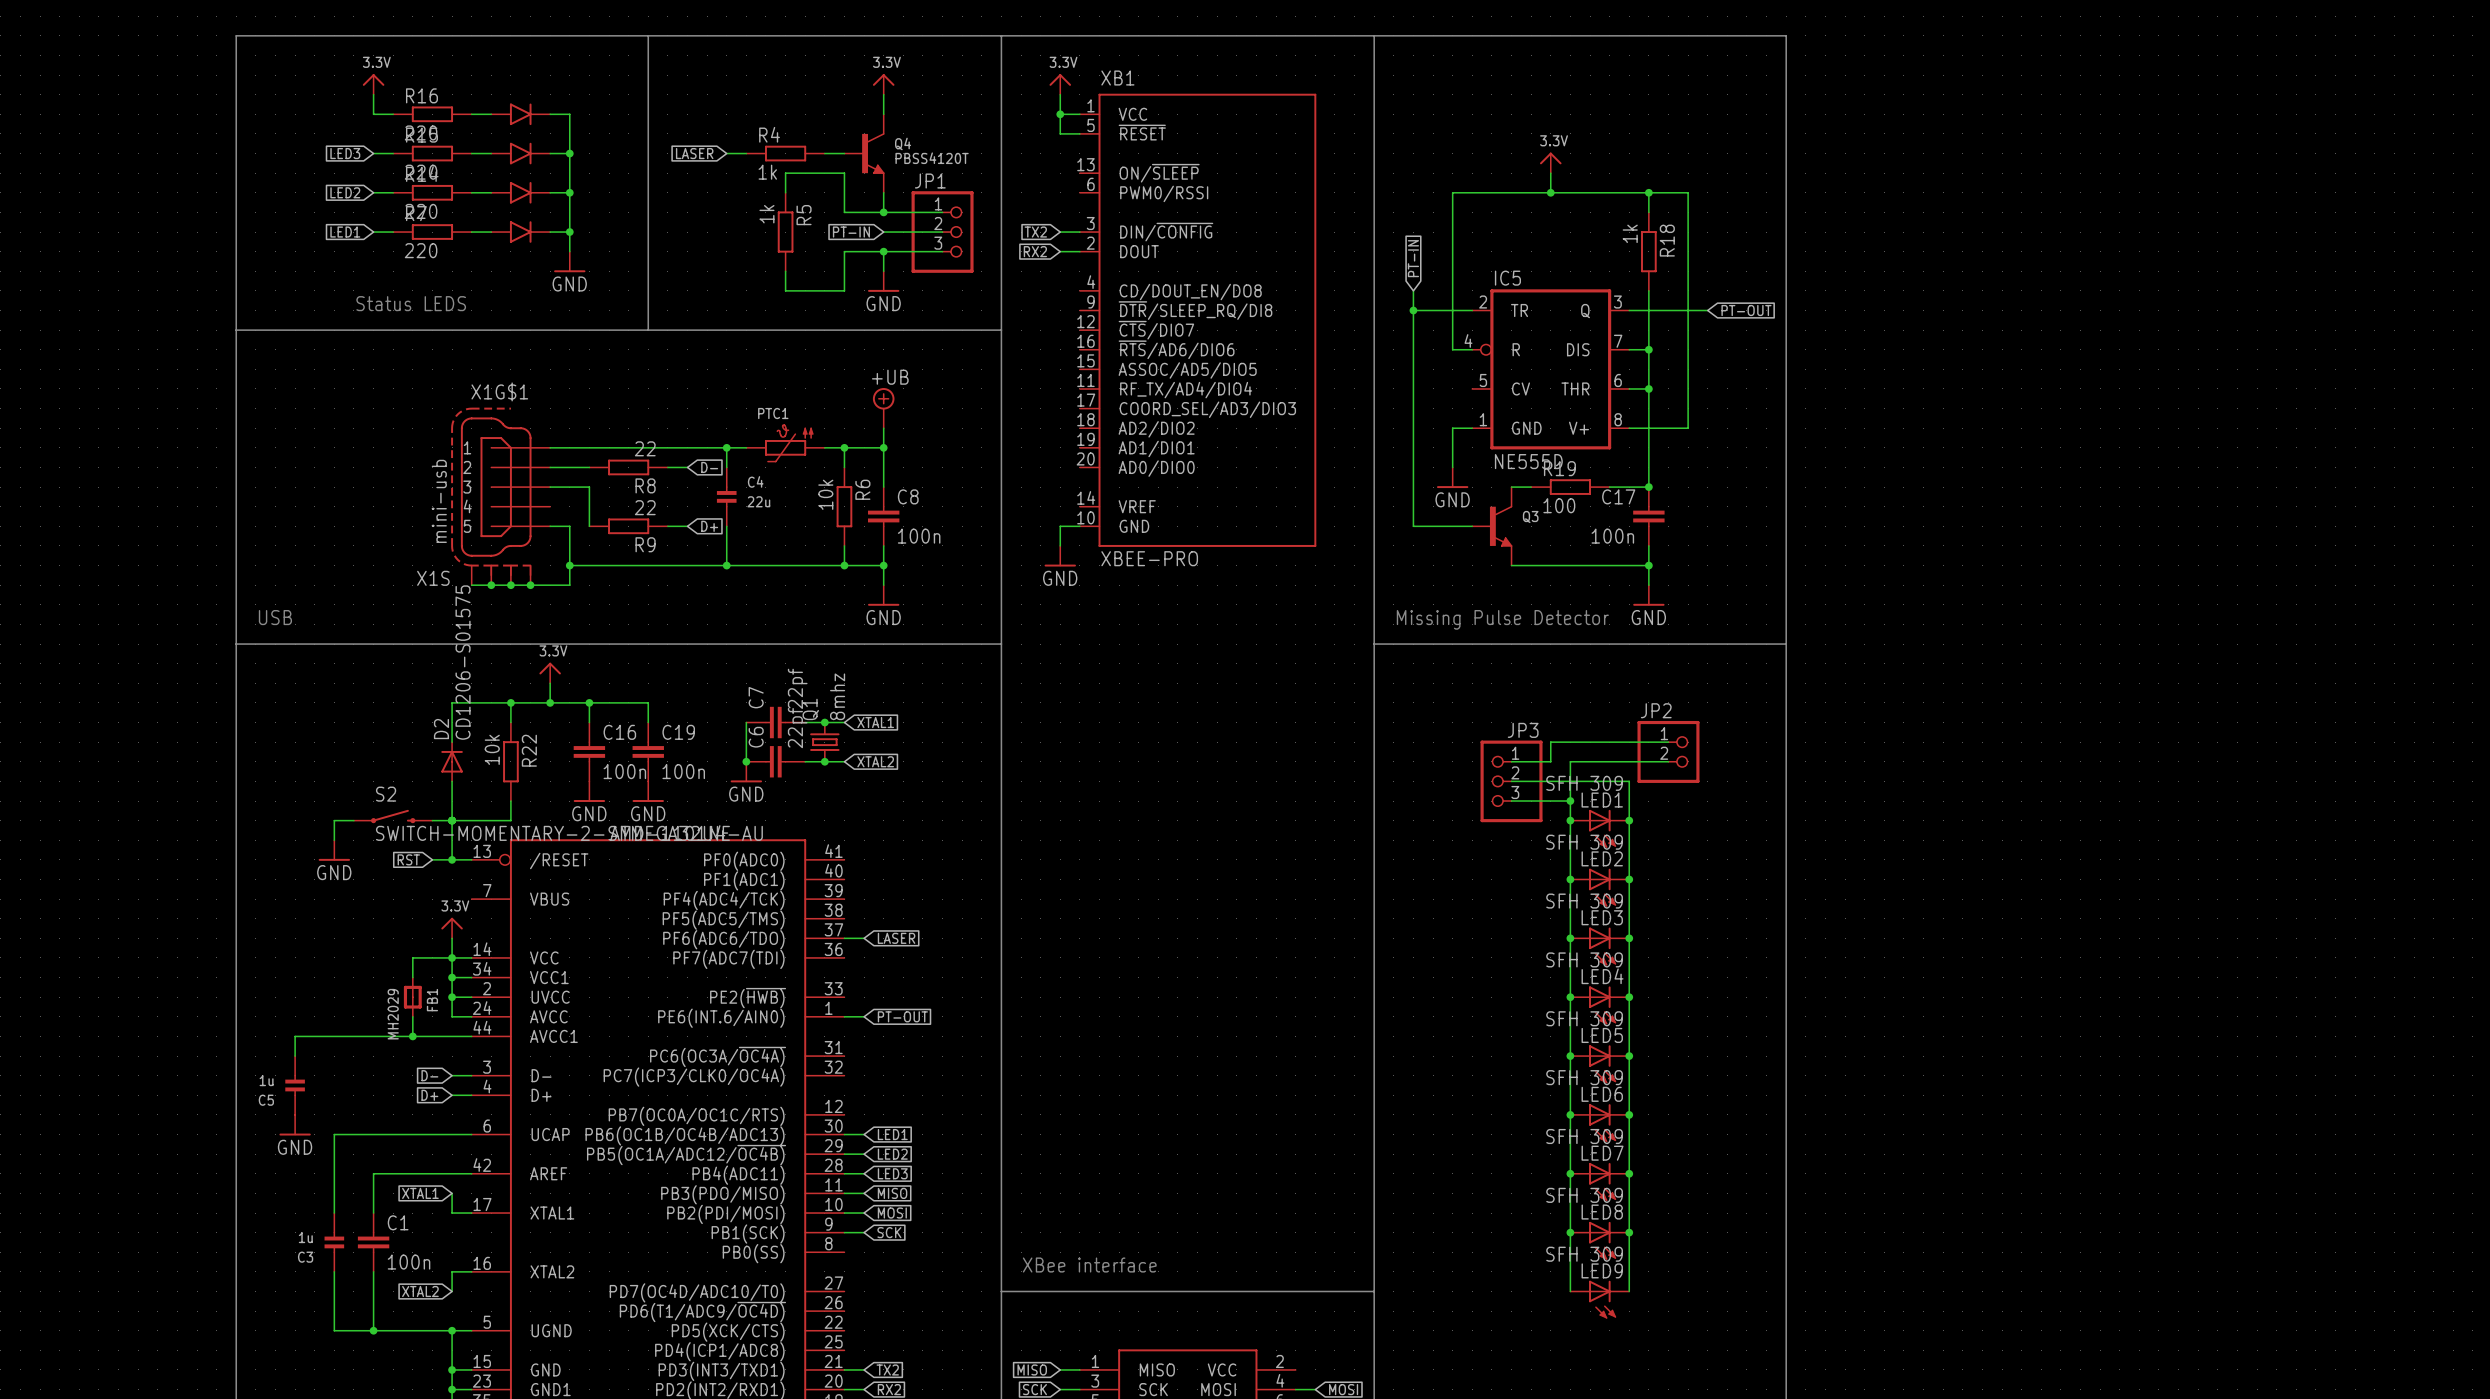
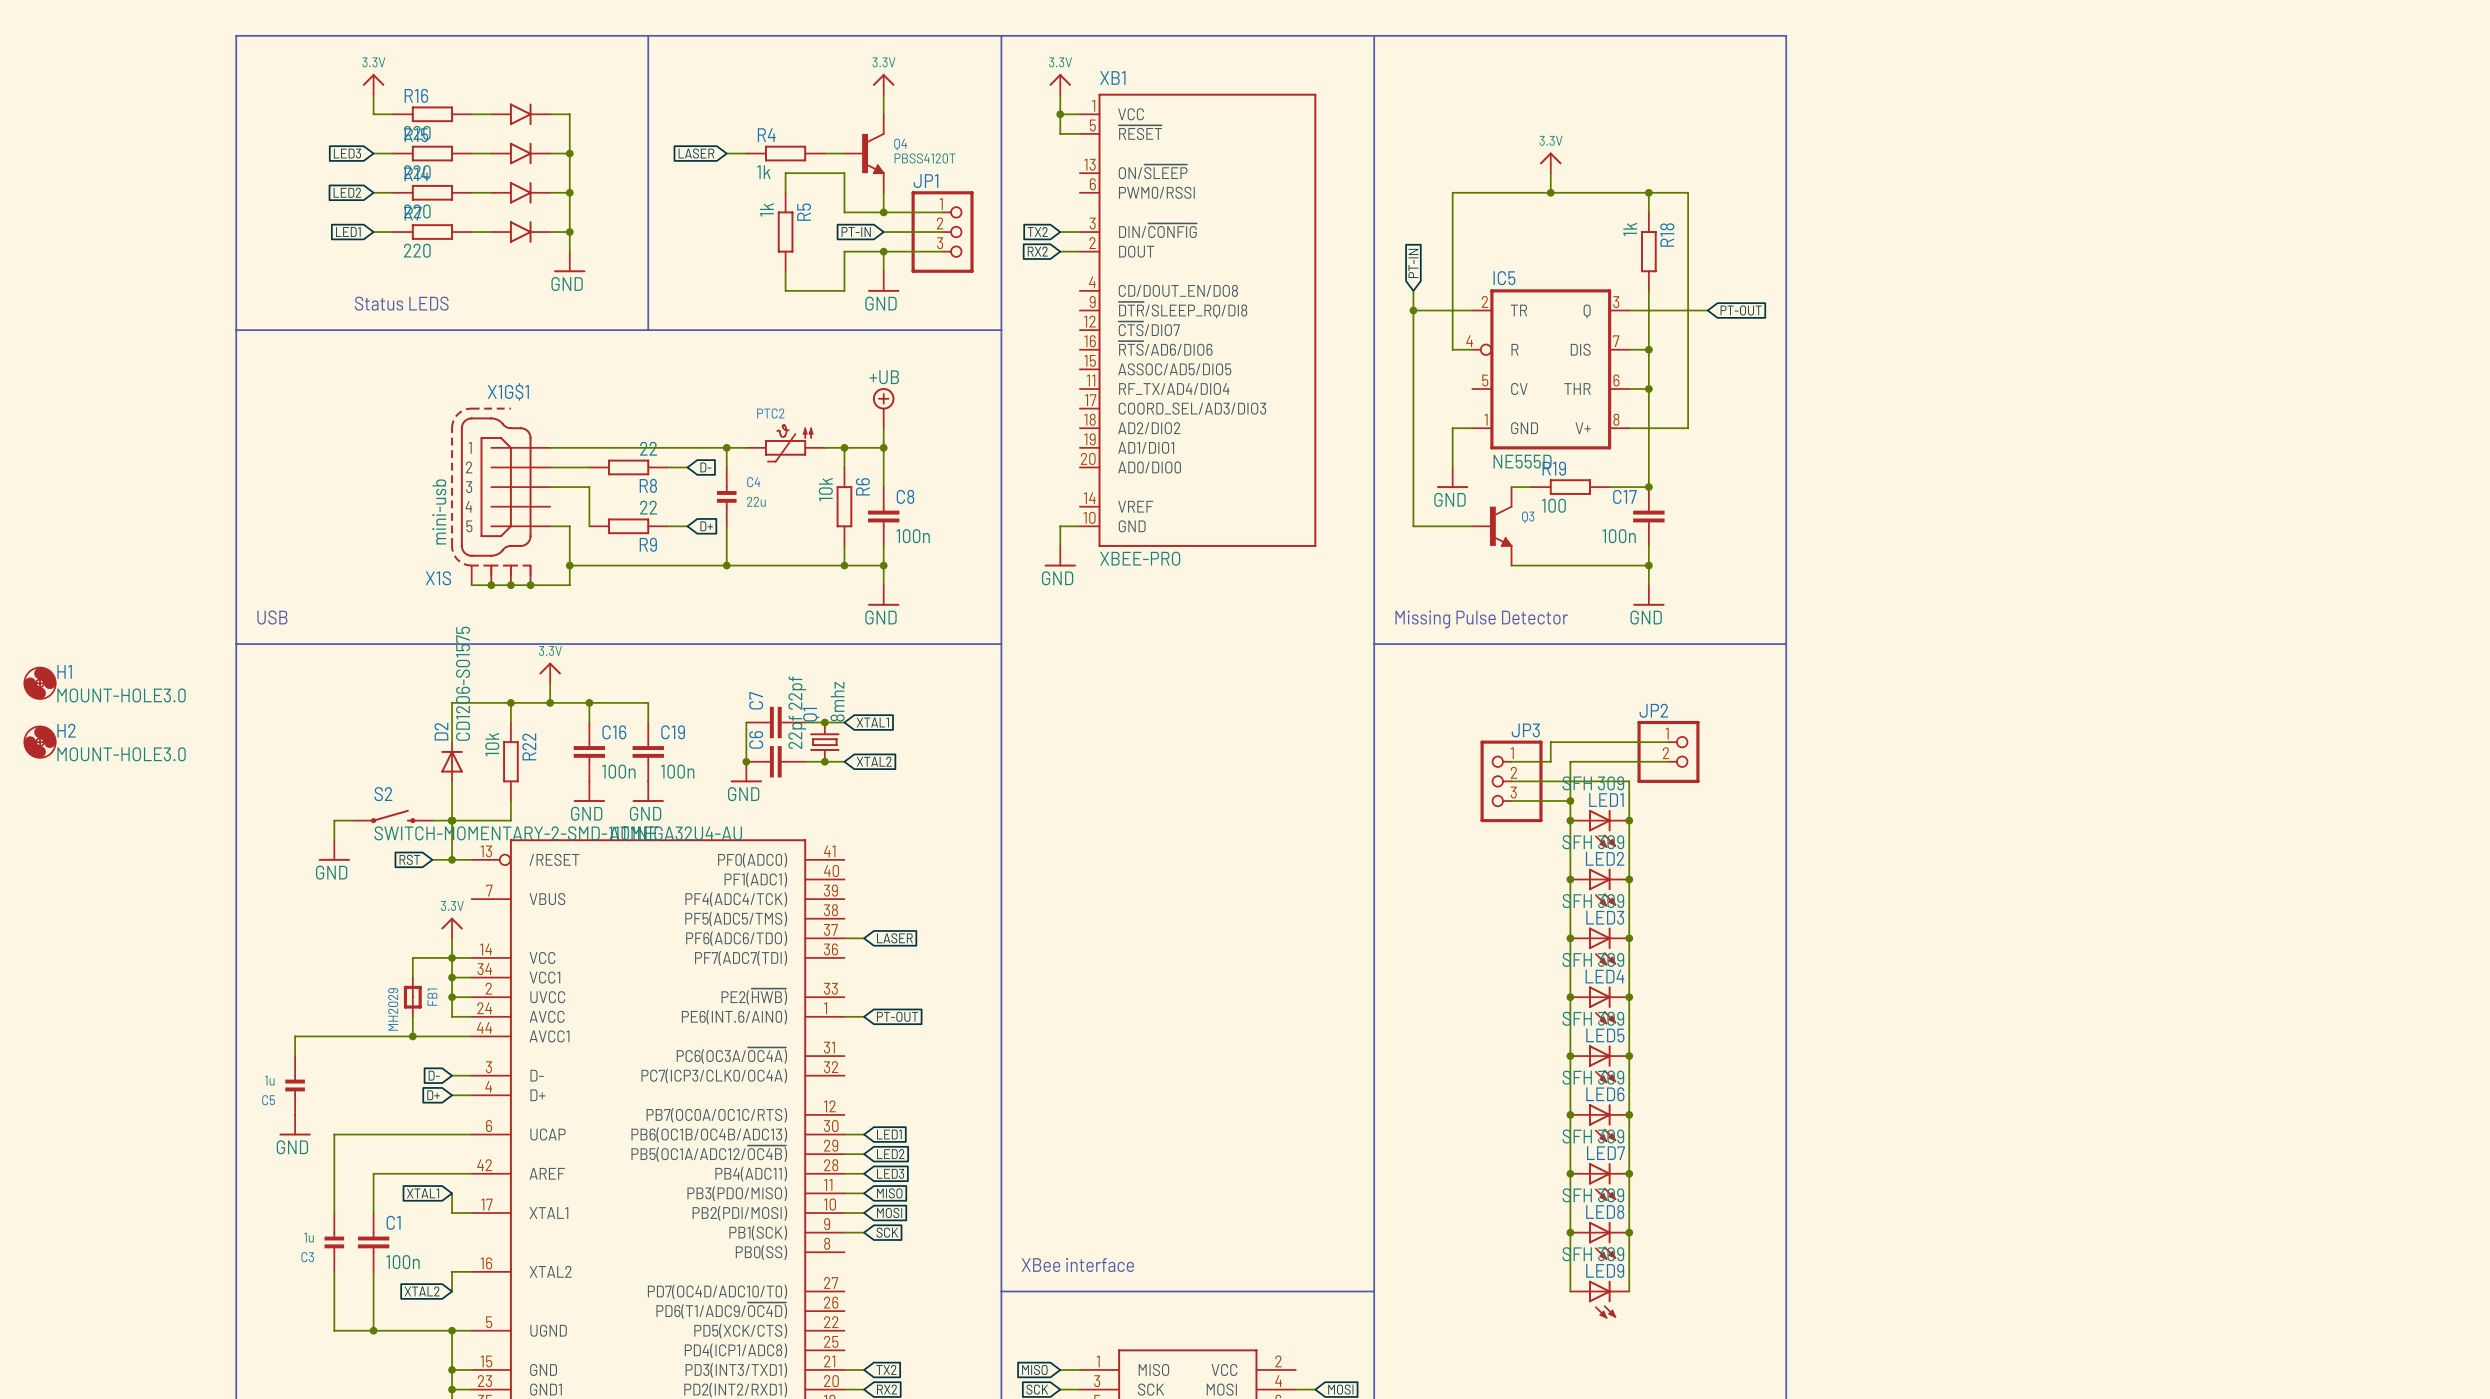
PTC1 name: PTC1 (773, 413) -> PTC2 (770, 413)
H1: none -> MOUNT-HOLE3.0 (40, 683)
H2: none -> MOUNT-HOLE3.0 (40, 742)

